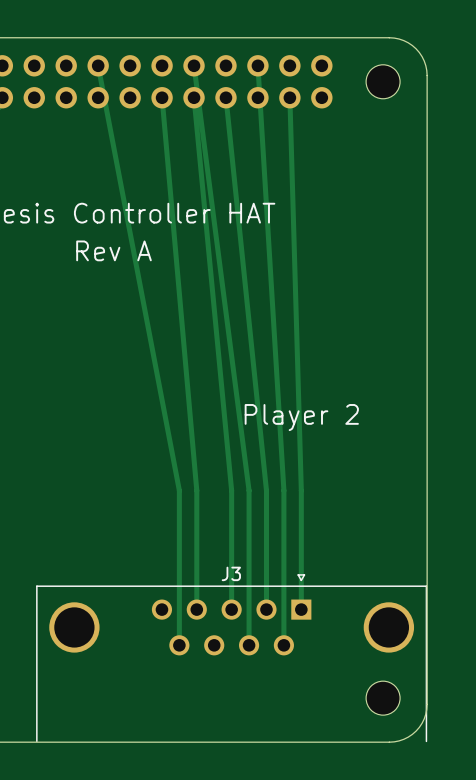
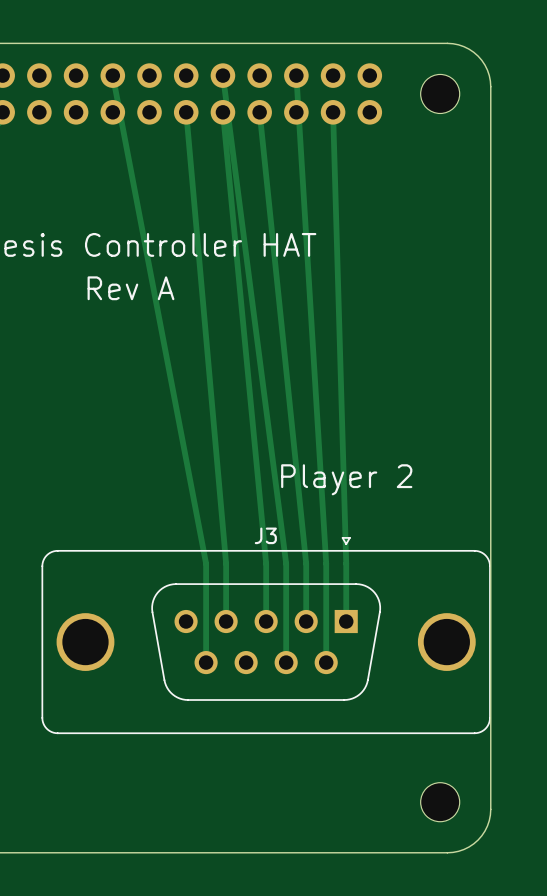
track: (196, 540) (196, 609) -> none
track: (231, 540) (231, 609) -> none
track: (266, 540) (266, 609) -> none
track: (301, 540) (301, 609) -> none
J3 footprint: [36, 574, 428, 743] -> [41, 537, 491, 735]
track: (179, 576) (179, 645) -> none
track: (249, 576) (249, 645) -> none
track: (283, 576) (283, 645) -> none

